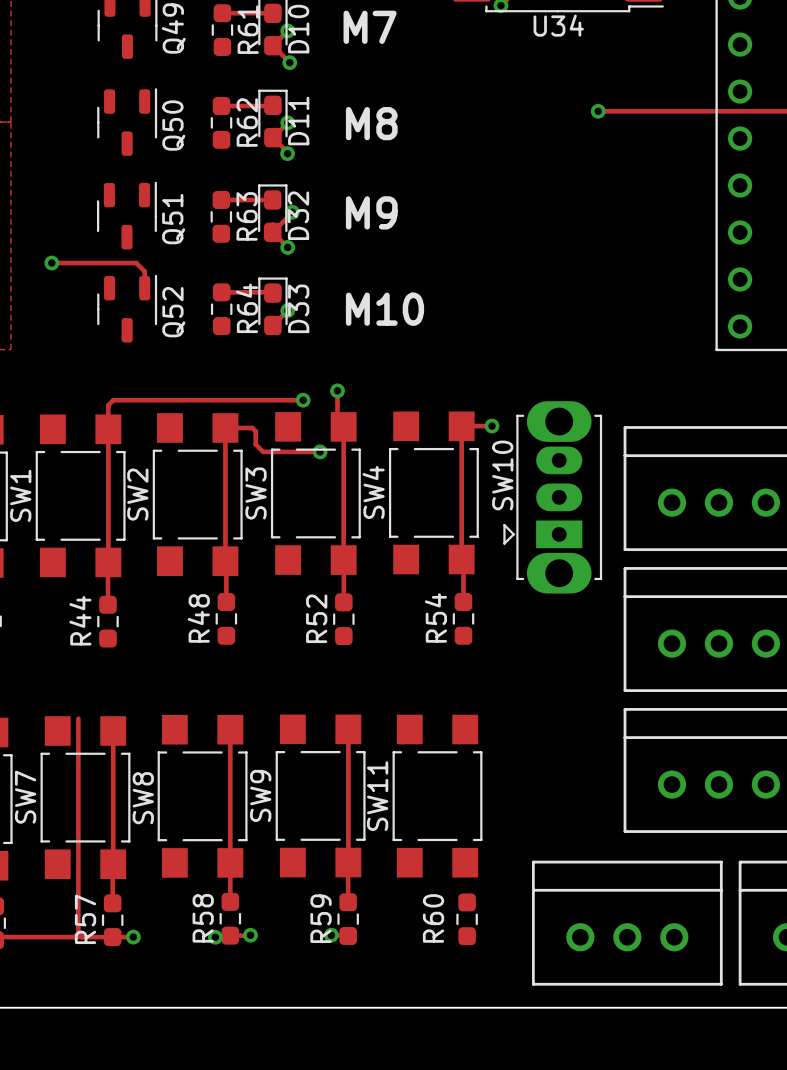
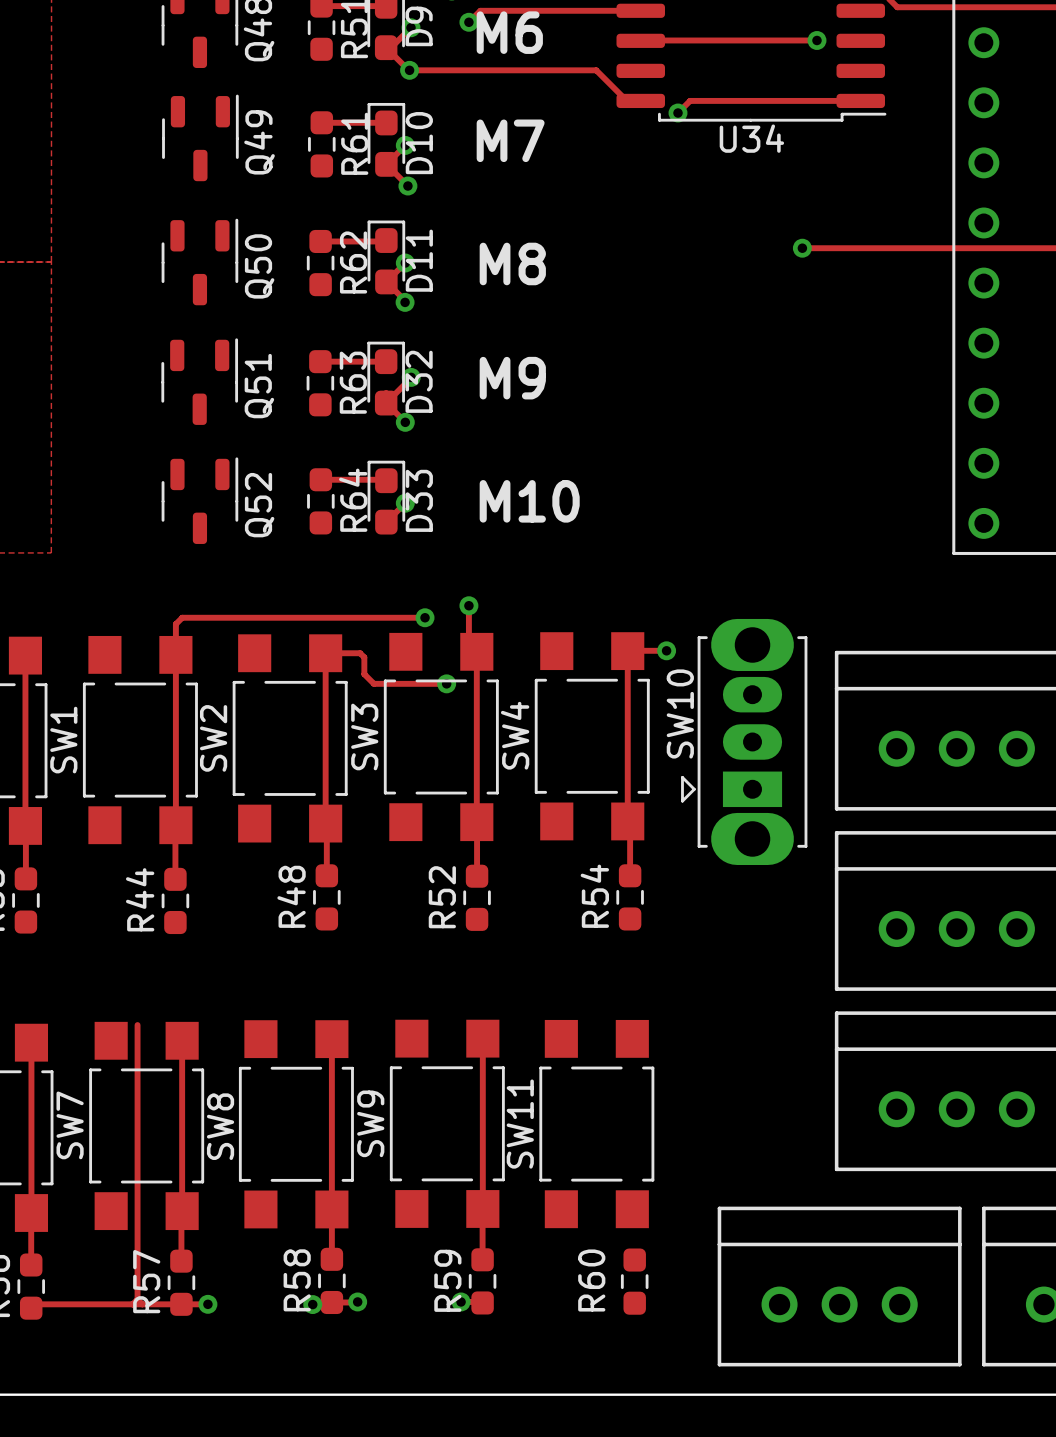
track: (51, 263) (136, 263) (144, 271) (144, 288) -> none
via: (51, 263) -> none

